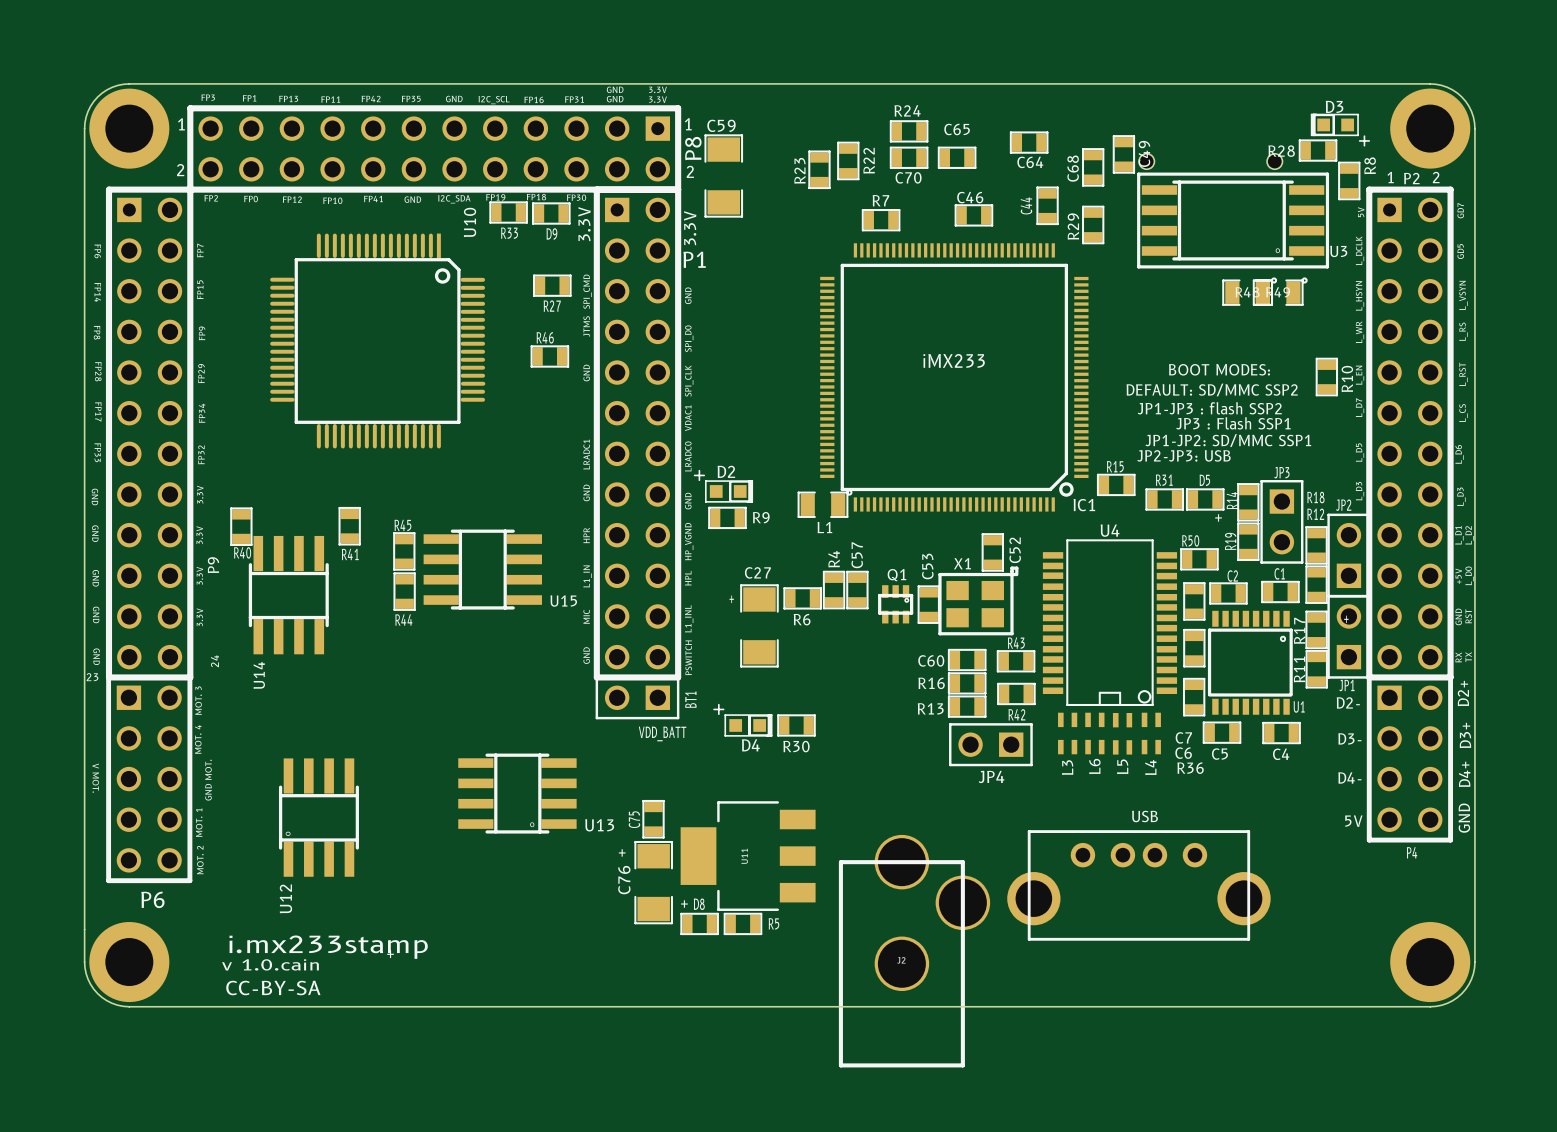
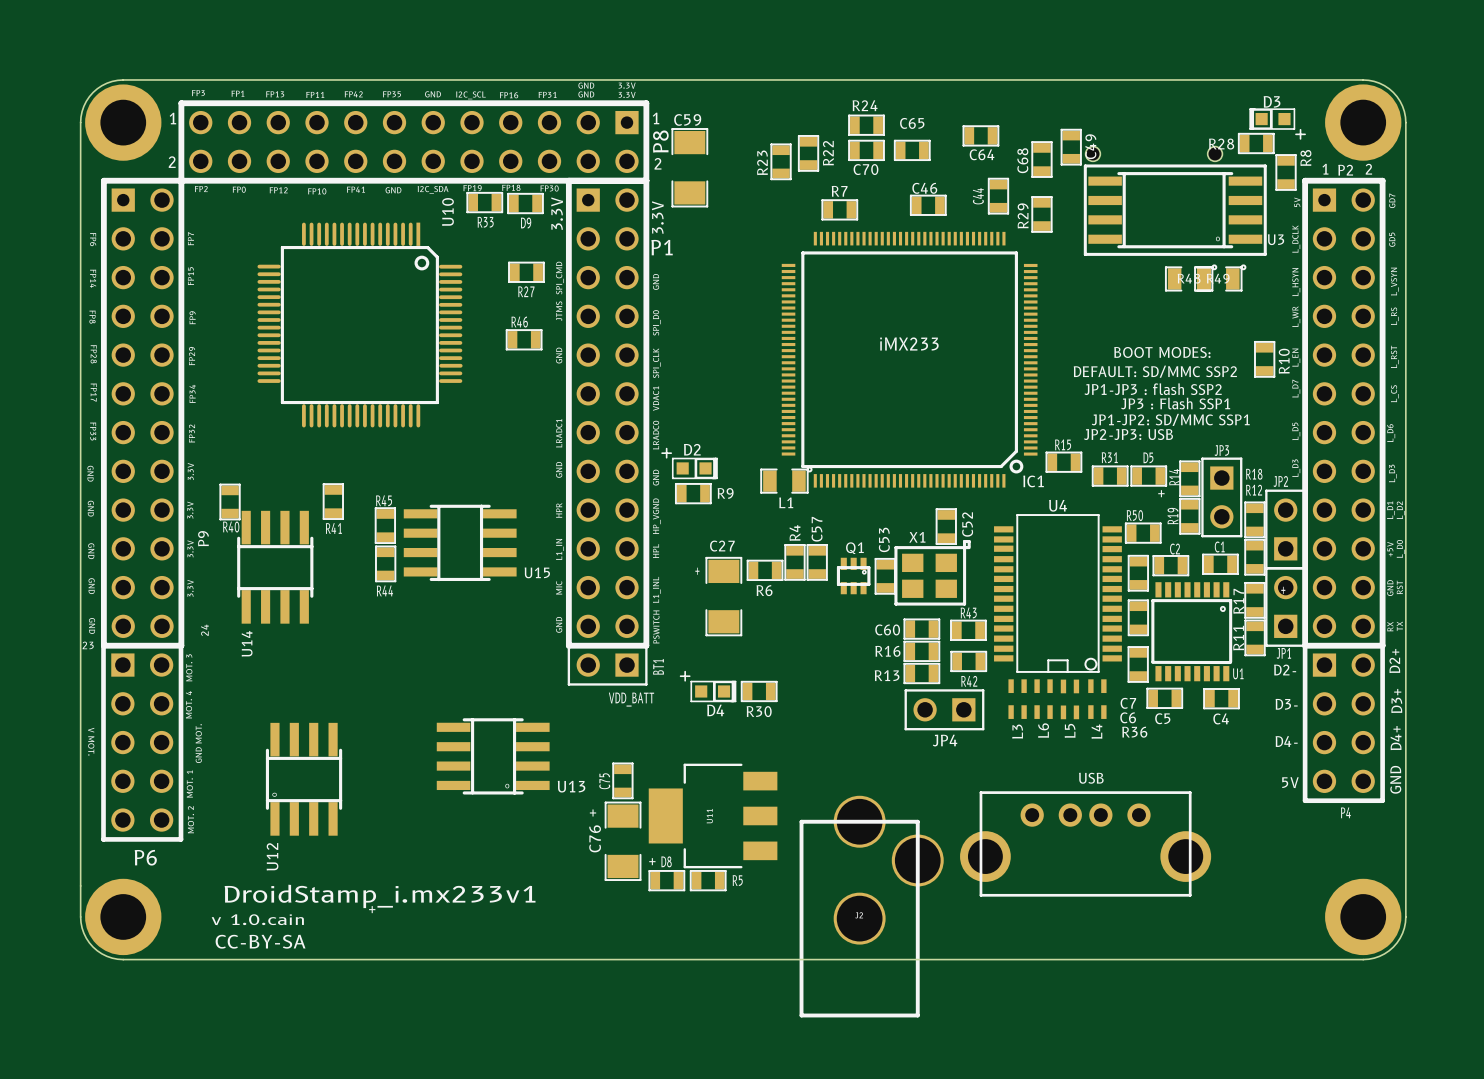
text: none -> DroidStamp_i.mx233v1 (380, 896)
text: i.mx233stamp (328, 947) -> none

